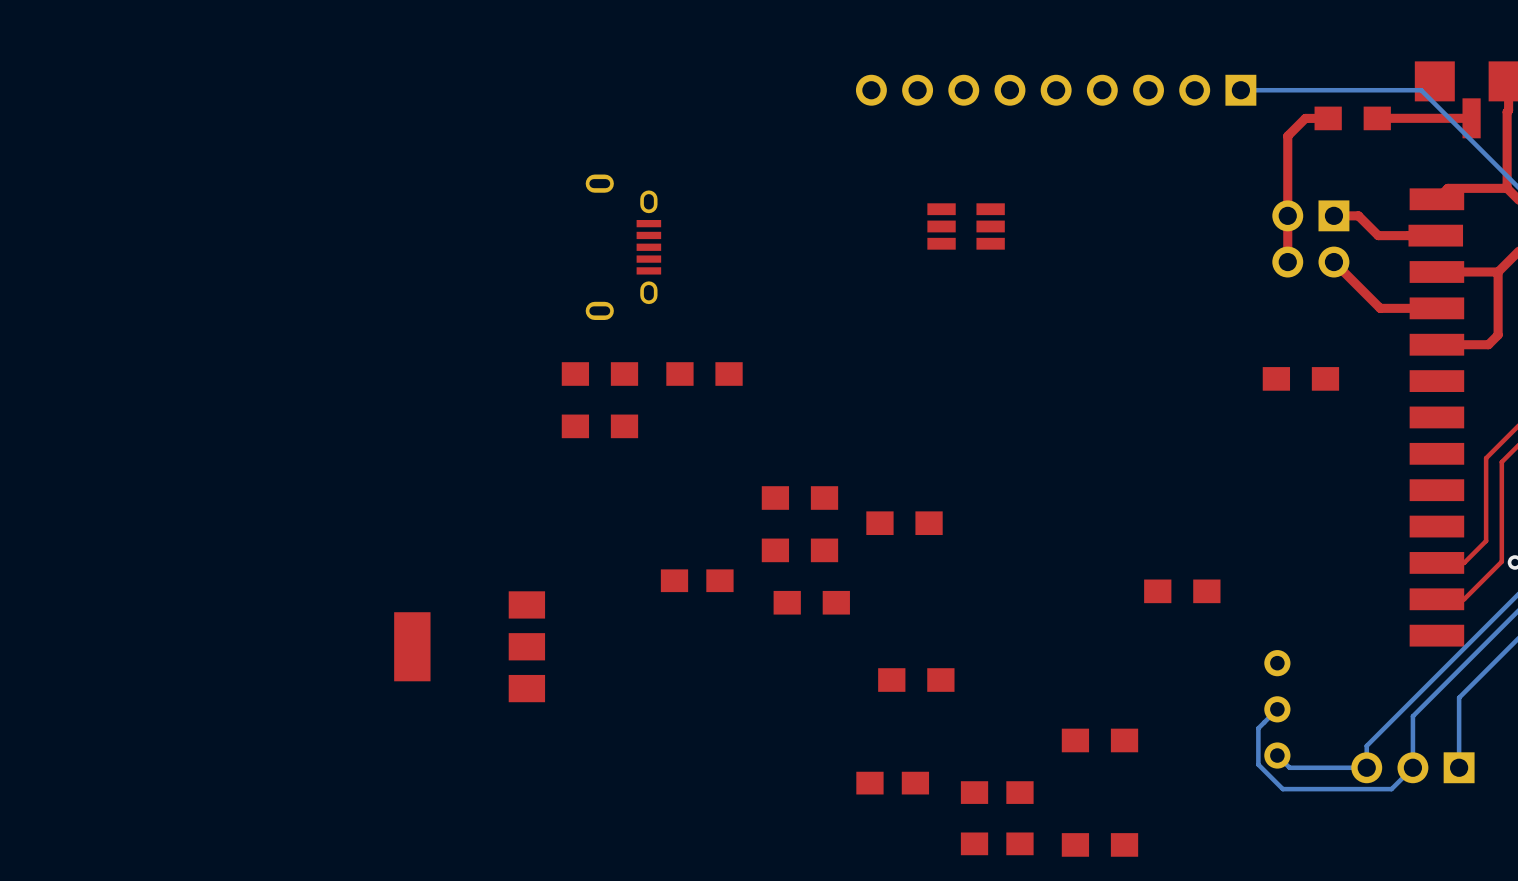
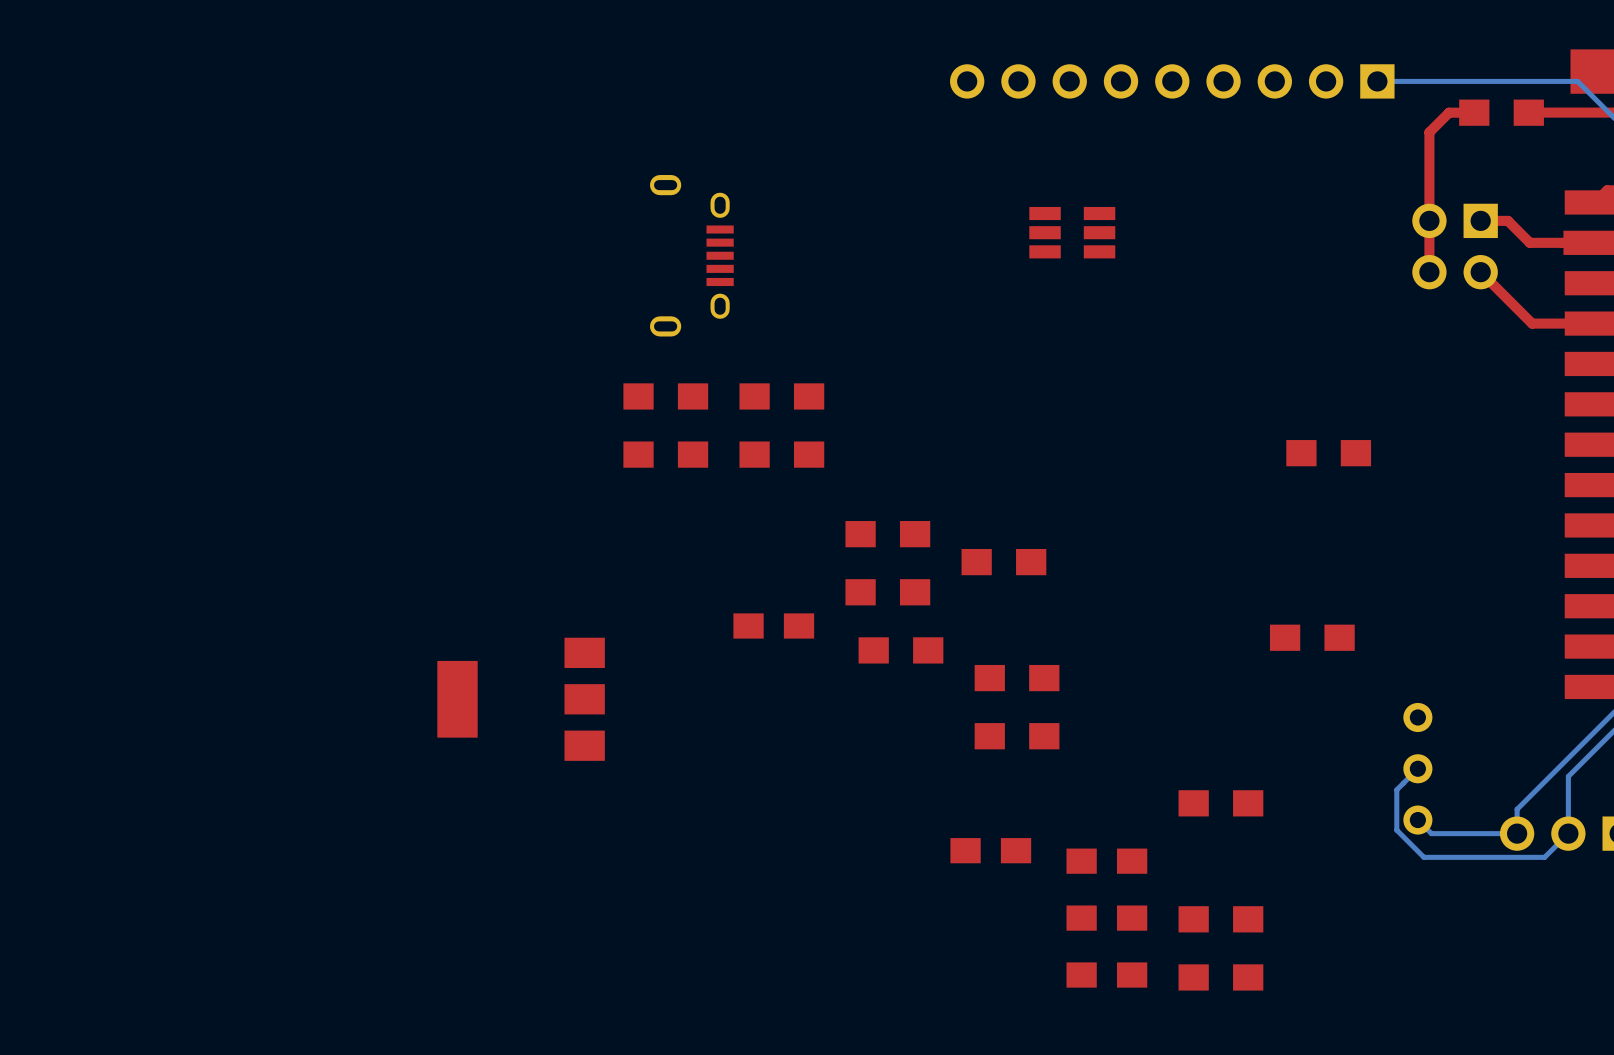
part position: (1300, 378) -> (1328, 453)
part: none -> (781, 454)
part: none -> (1017, 678)

